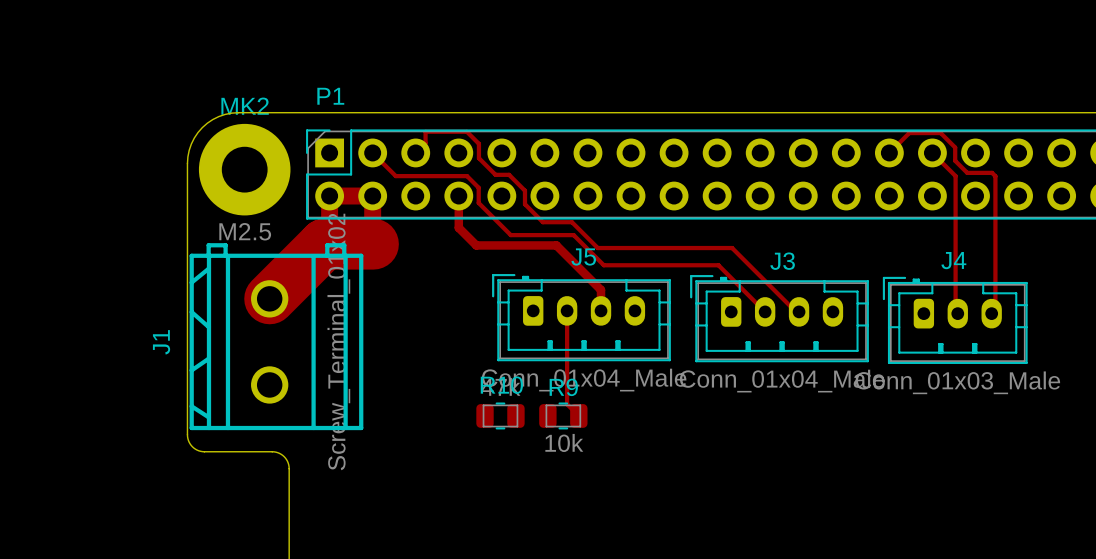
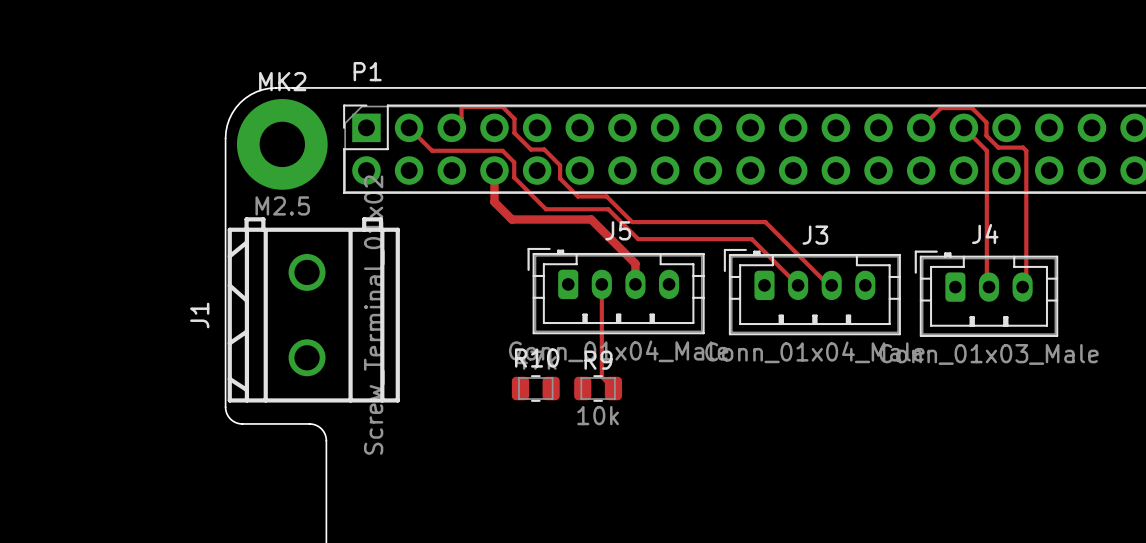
track: (325, 244) (329, 240) (329, 196) (372, 196) (373, 244) (324, 244) (269, 298) -> none

